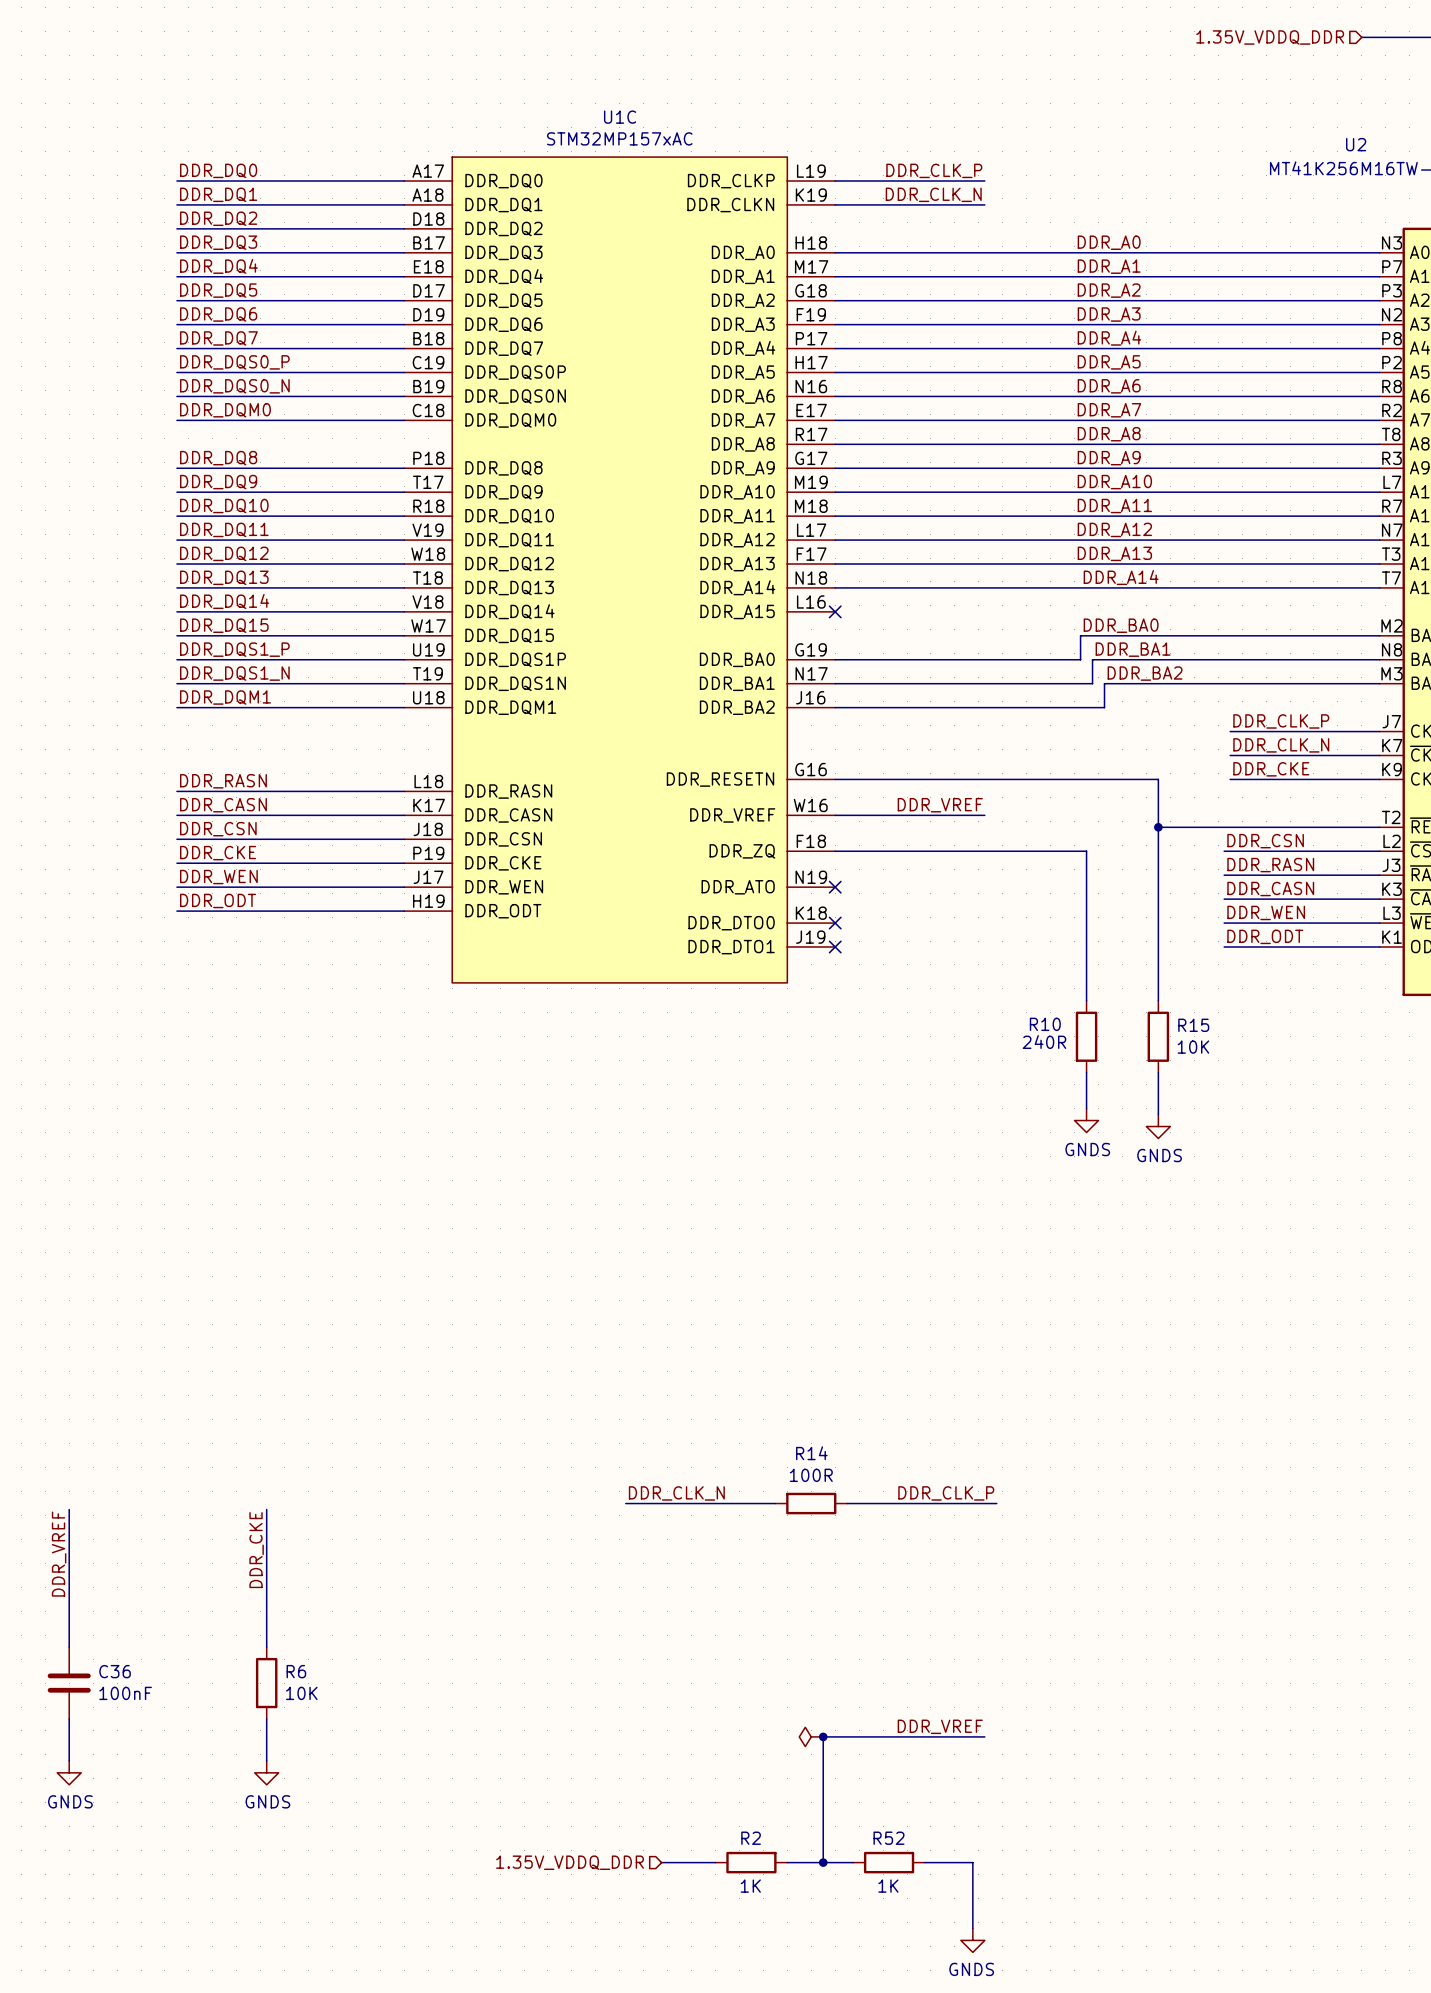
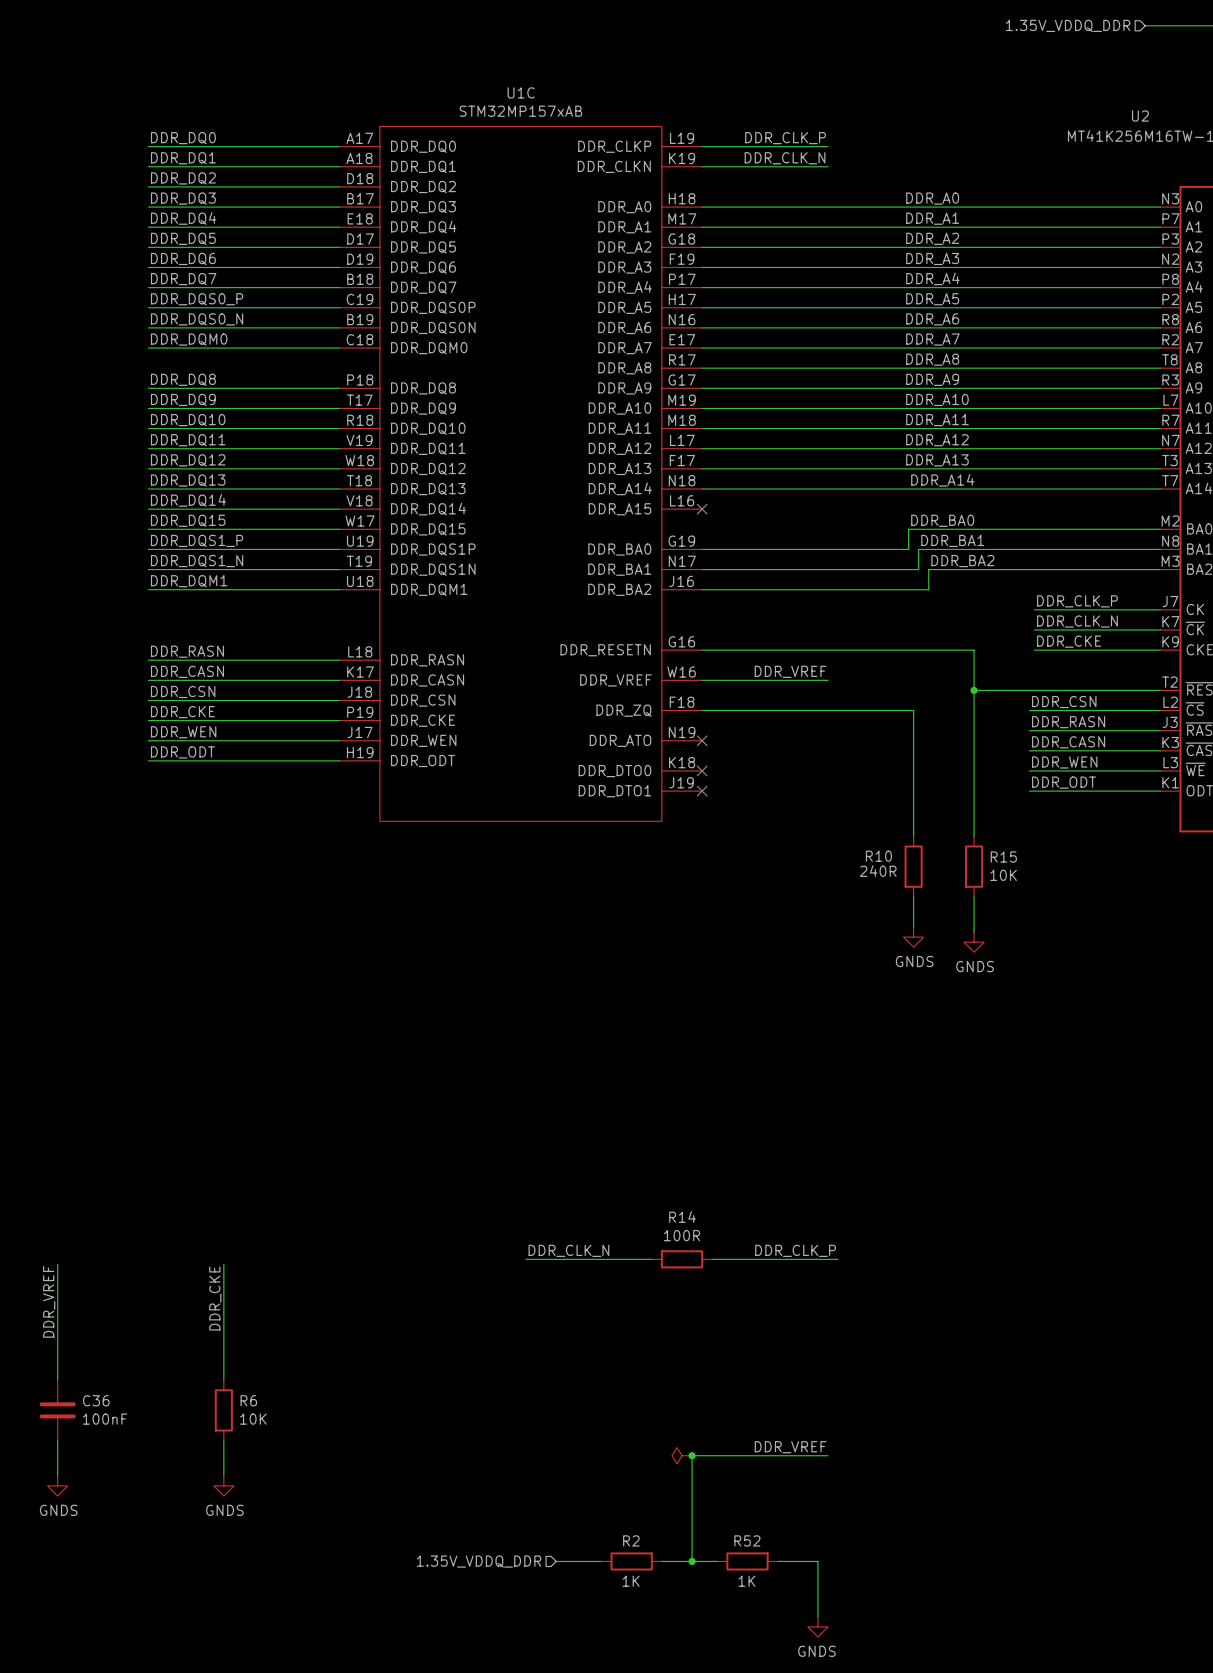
U1C value: STM32MP157xAC (619, 138) -> STM32MP157xAB (520, 111)

